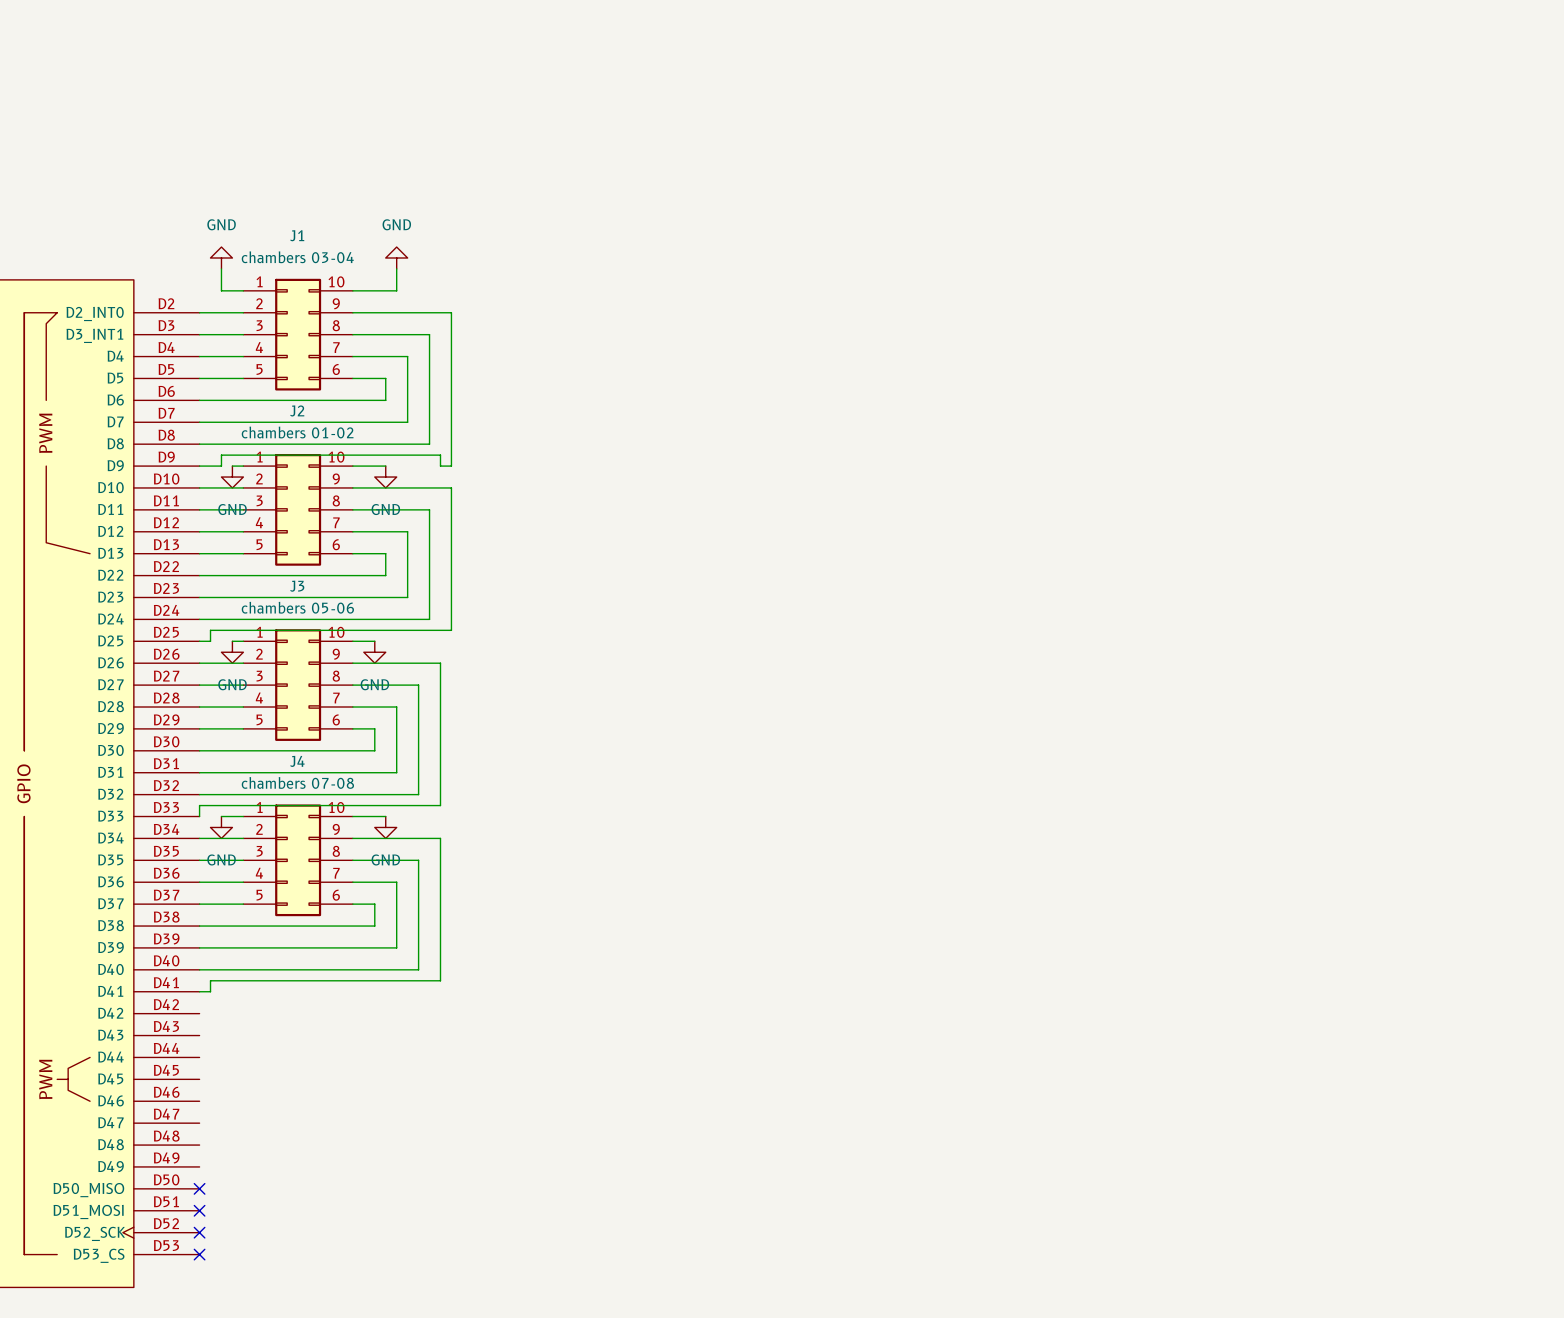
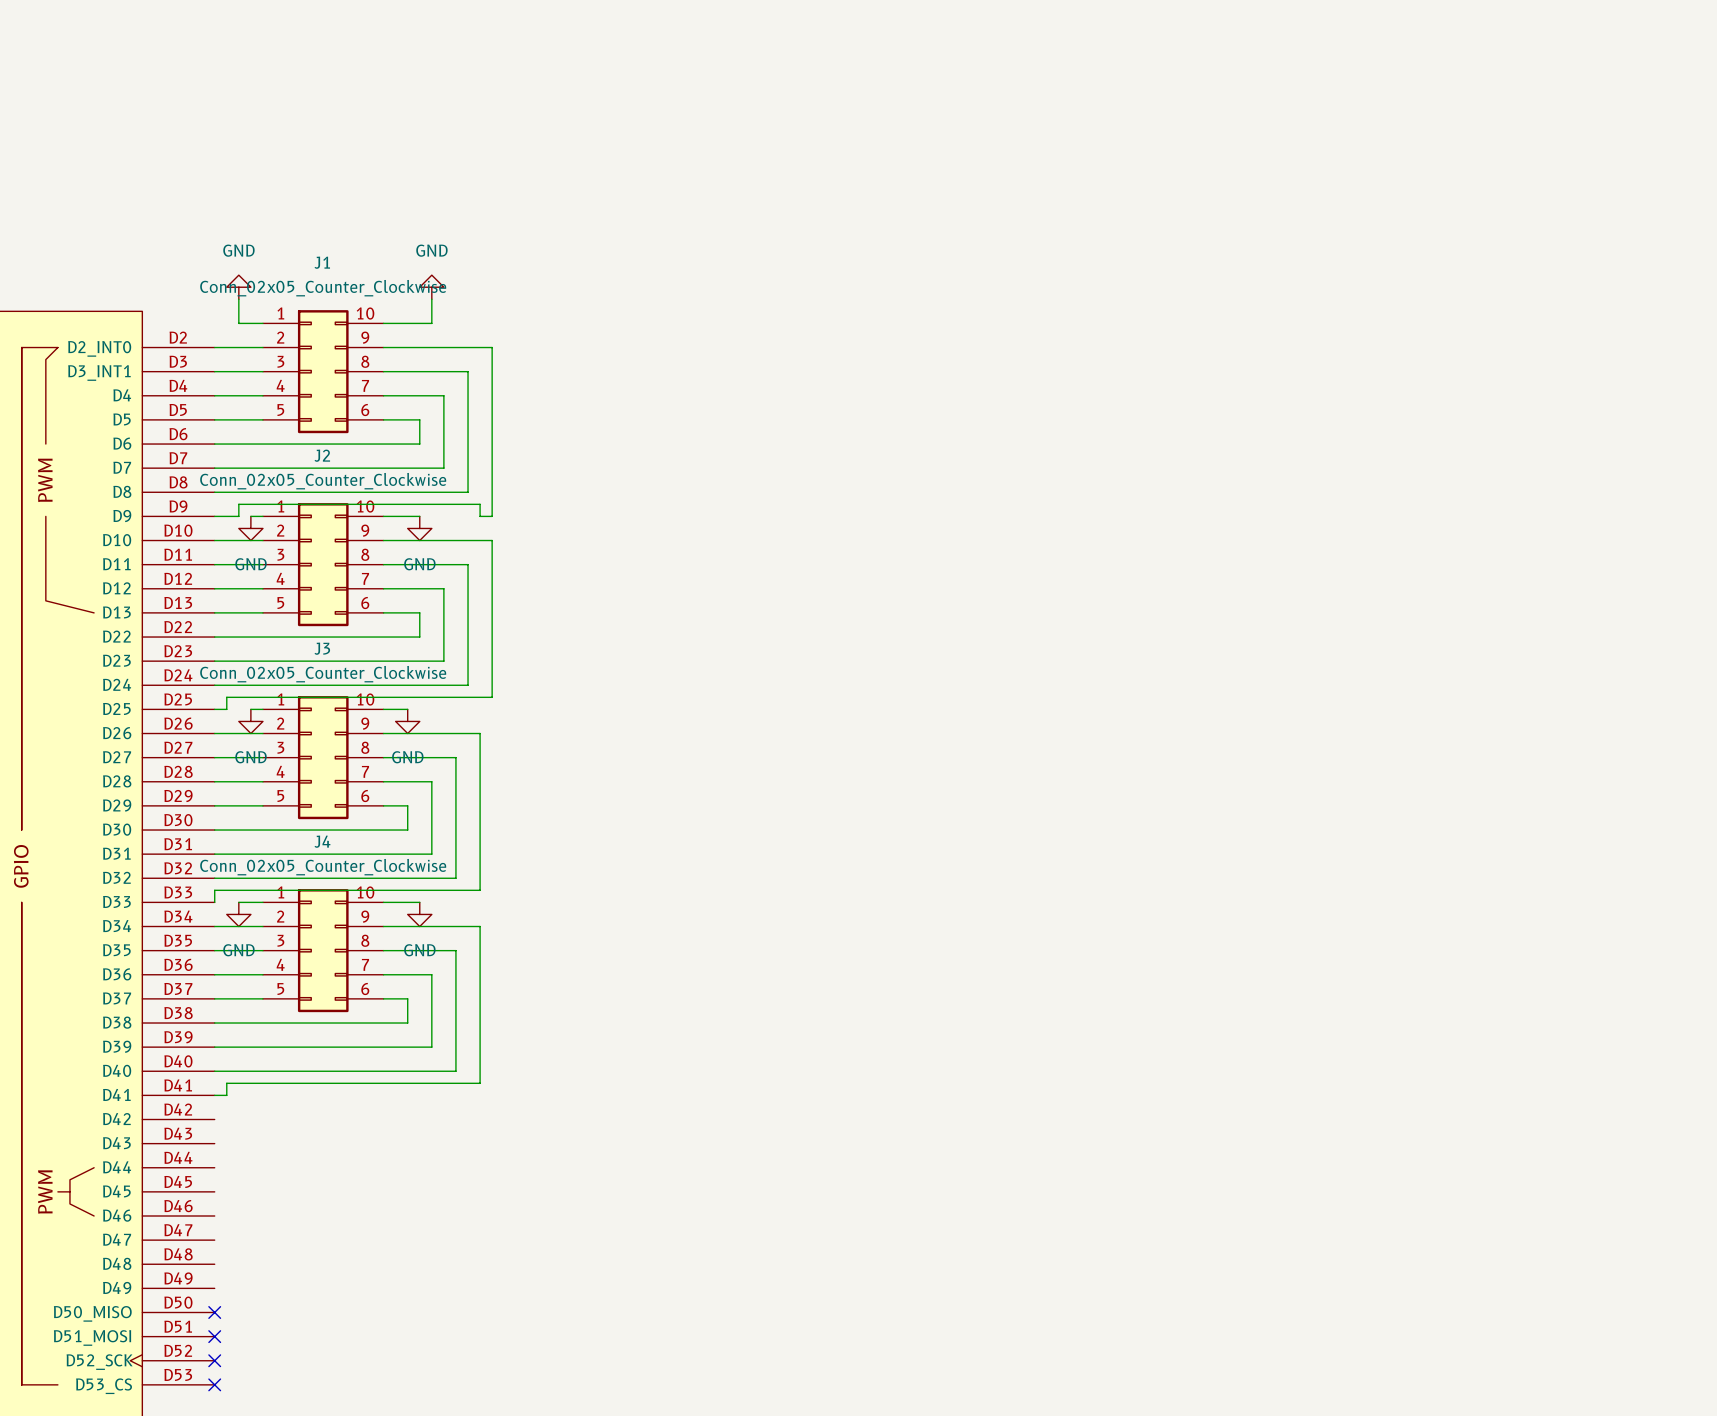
J1 value: chambers 03-04 (297, 257) -> Conn_02x05_Counter_Clockwise (323, 288)
J2 value: chambers 01-02 (297, 432) -> Conn_02x05_Counter_Clockwise (323, 481)
J3 value: chambers 05-06 (297, 607) -> Conn_02x05_Counter_Clockwise (323, 674)
J4 value: chambers 07-08 (297, 782) -> Conn_02x05_Counter_Clockwise (323, 867)

